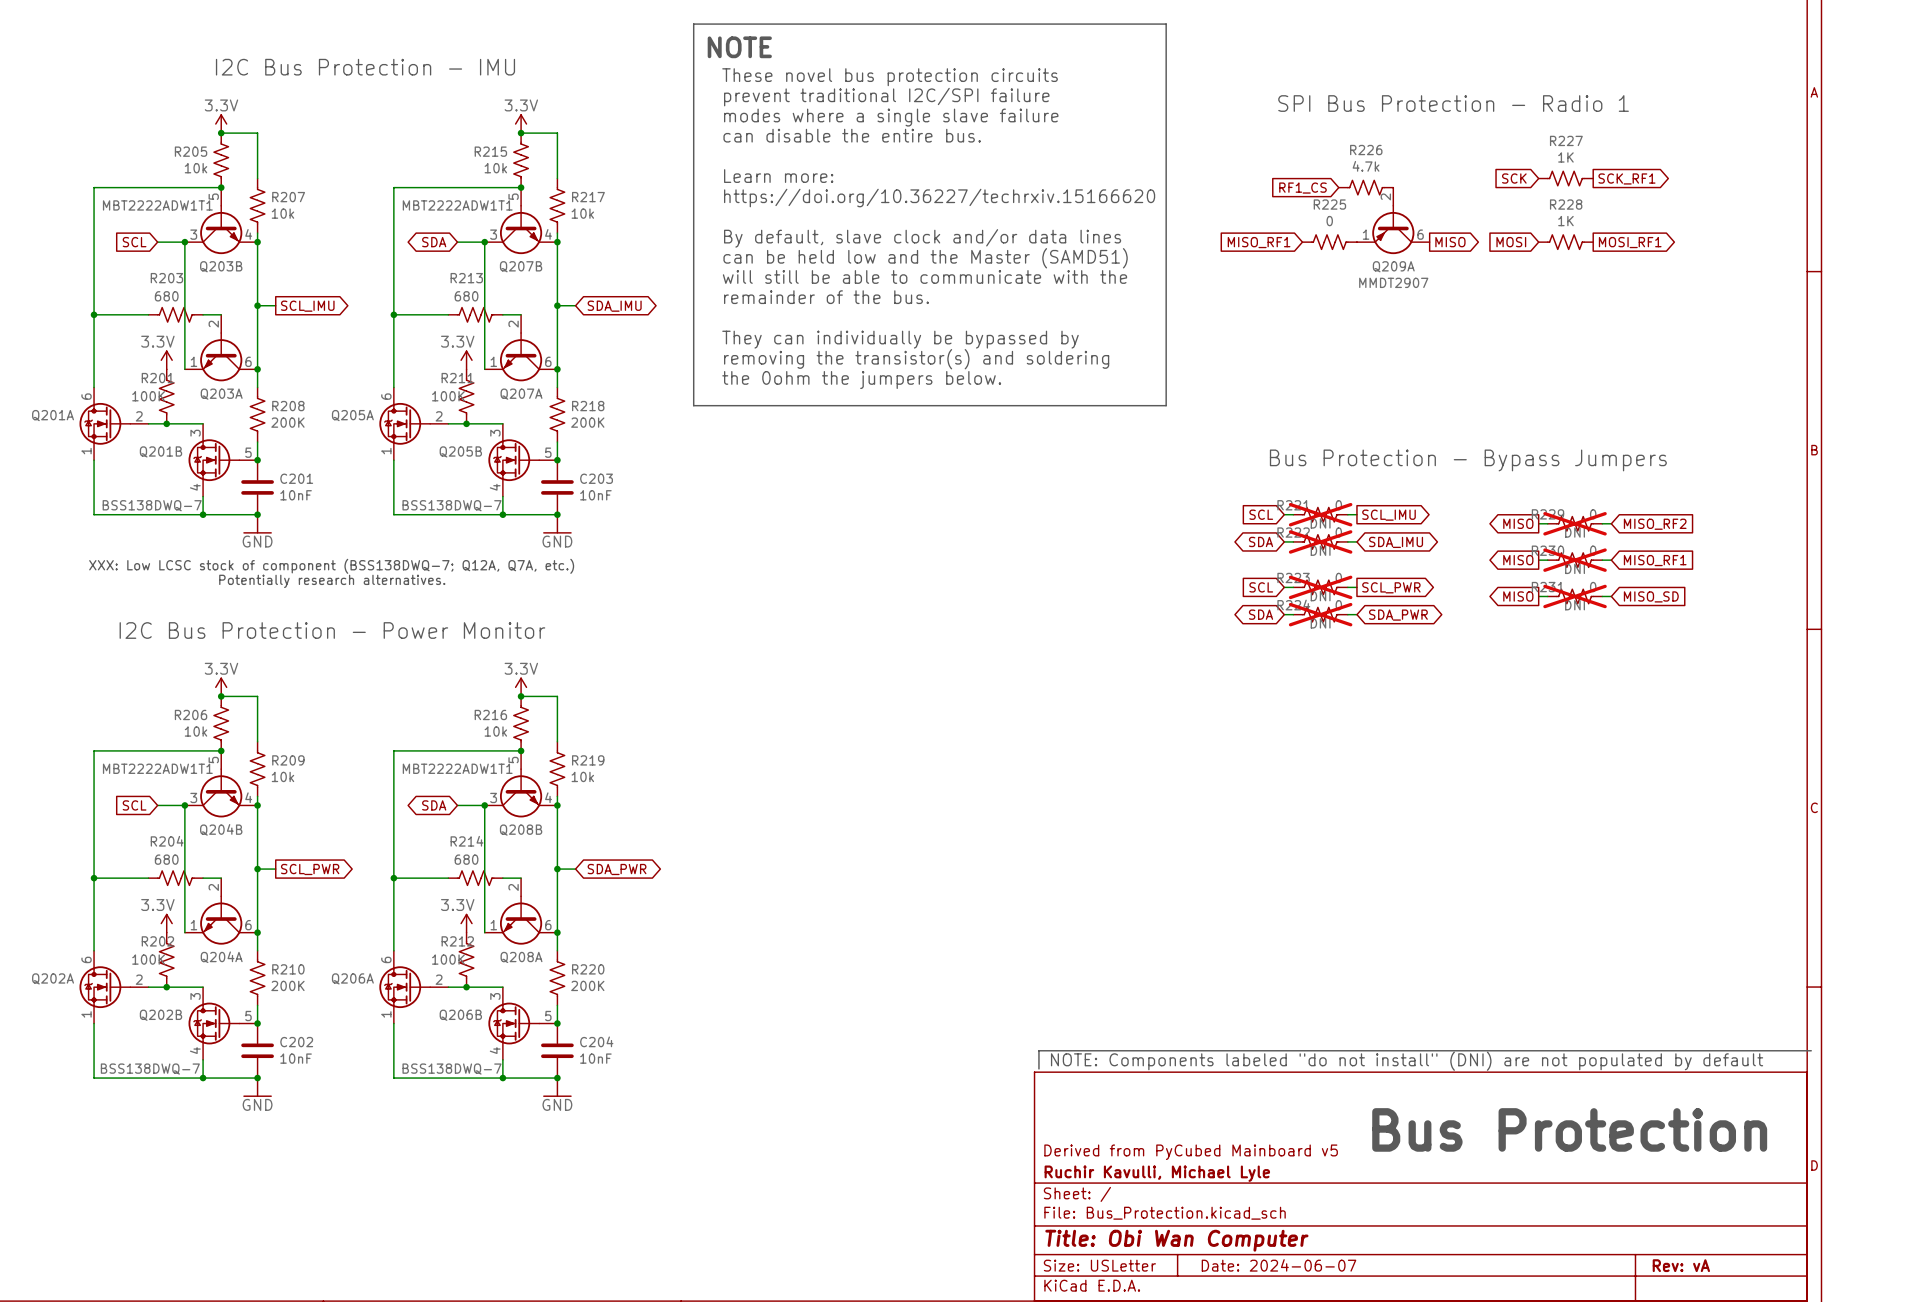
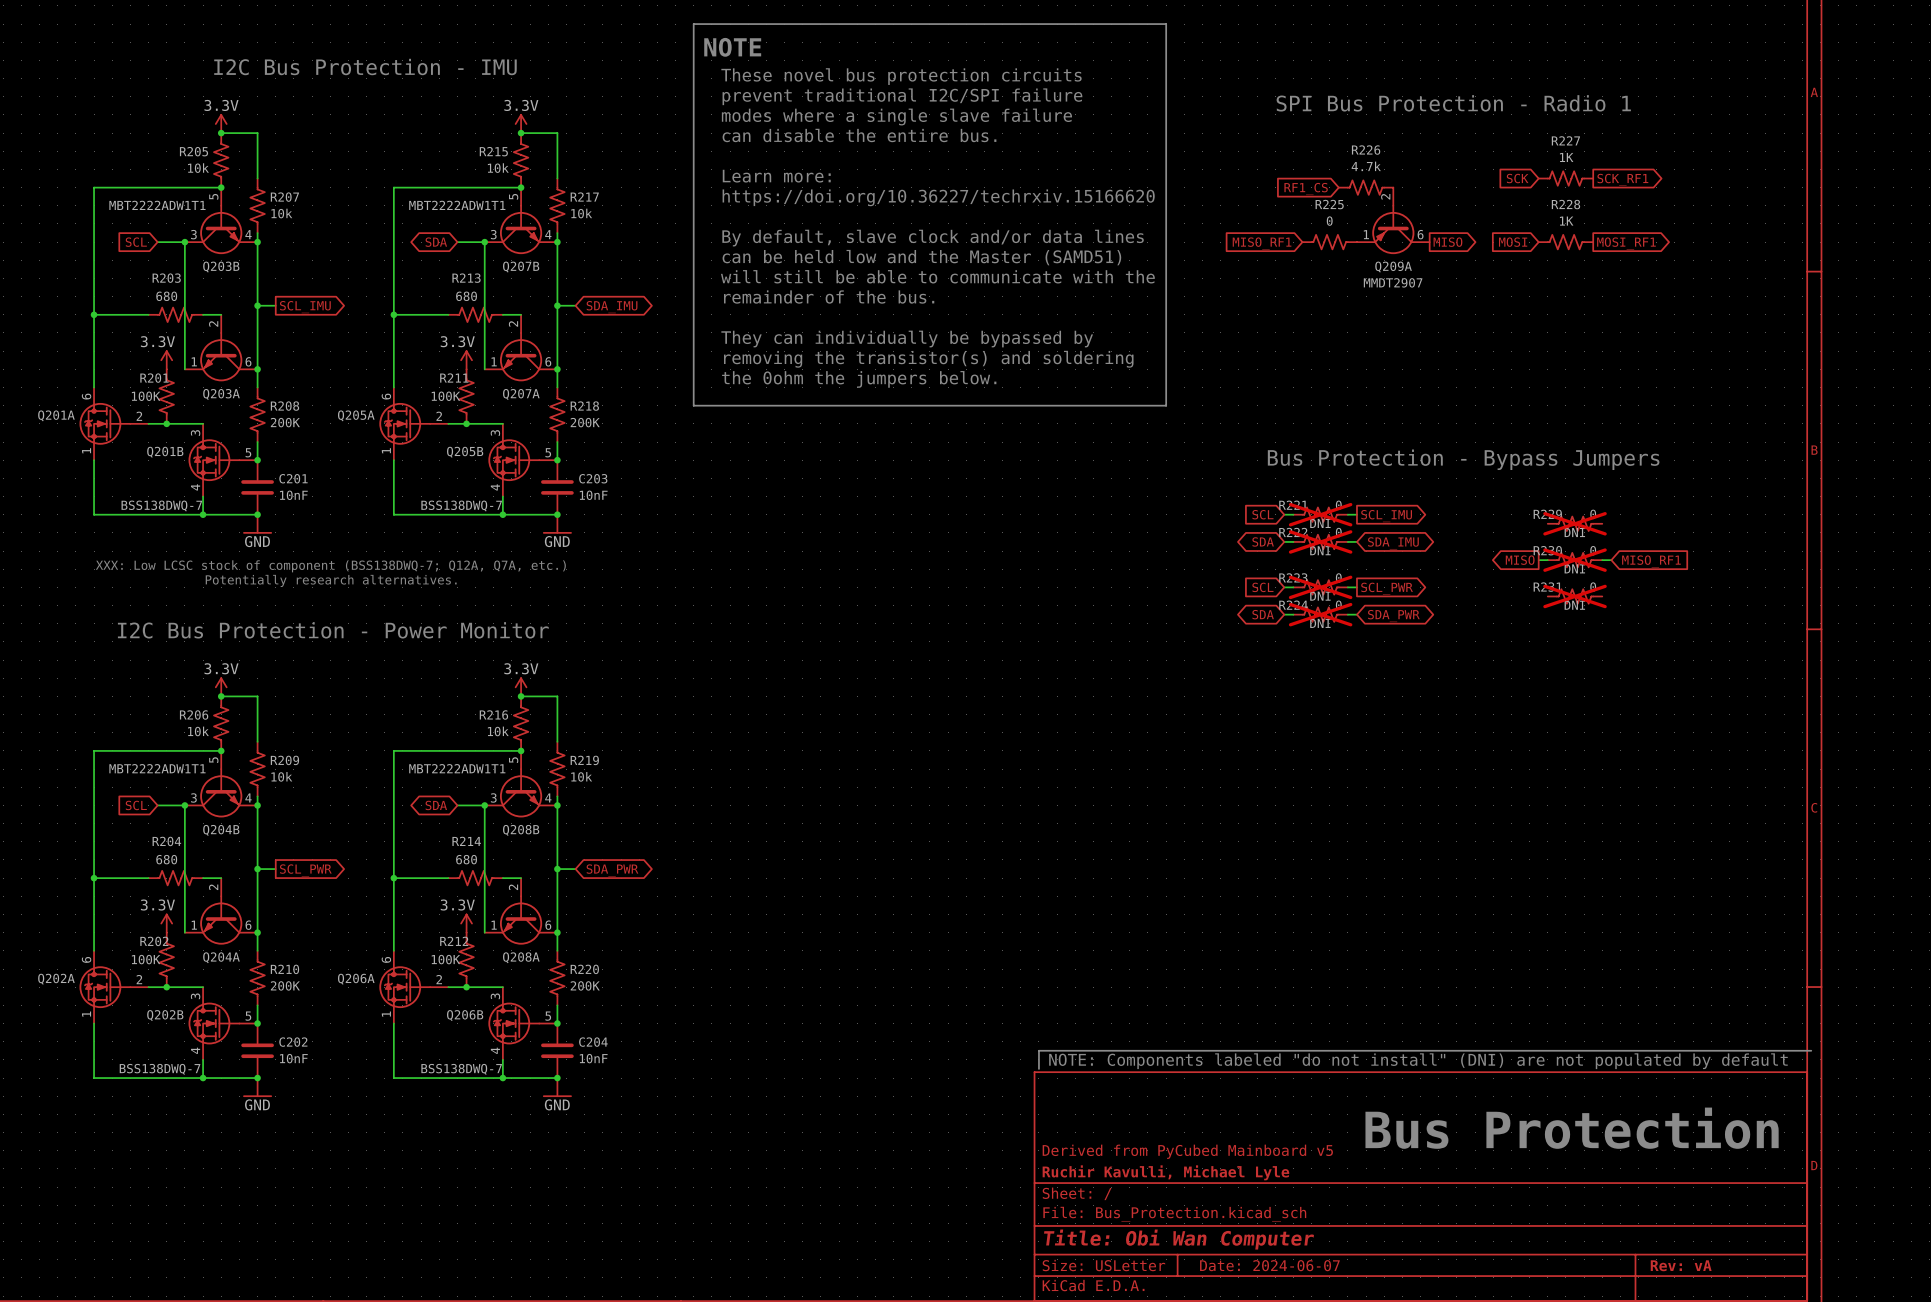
global label: MISO (1518, 523) -> none
wire: (1538, 523) (1547, 523) -> none
wire: (1602, 523) (1611, 523) -> none
global label: MISO_RF2 (1655, 524) -> none
global label: MISO (1518, 596) -> none
wire: (1538, 596) (1547, 596) -> none
wire: (1602, 596) (1611, 596) -> none
global label: MISO_SD (1651, 596) -> none

